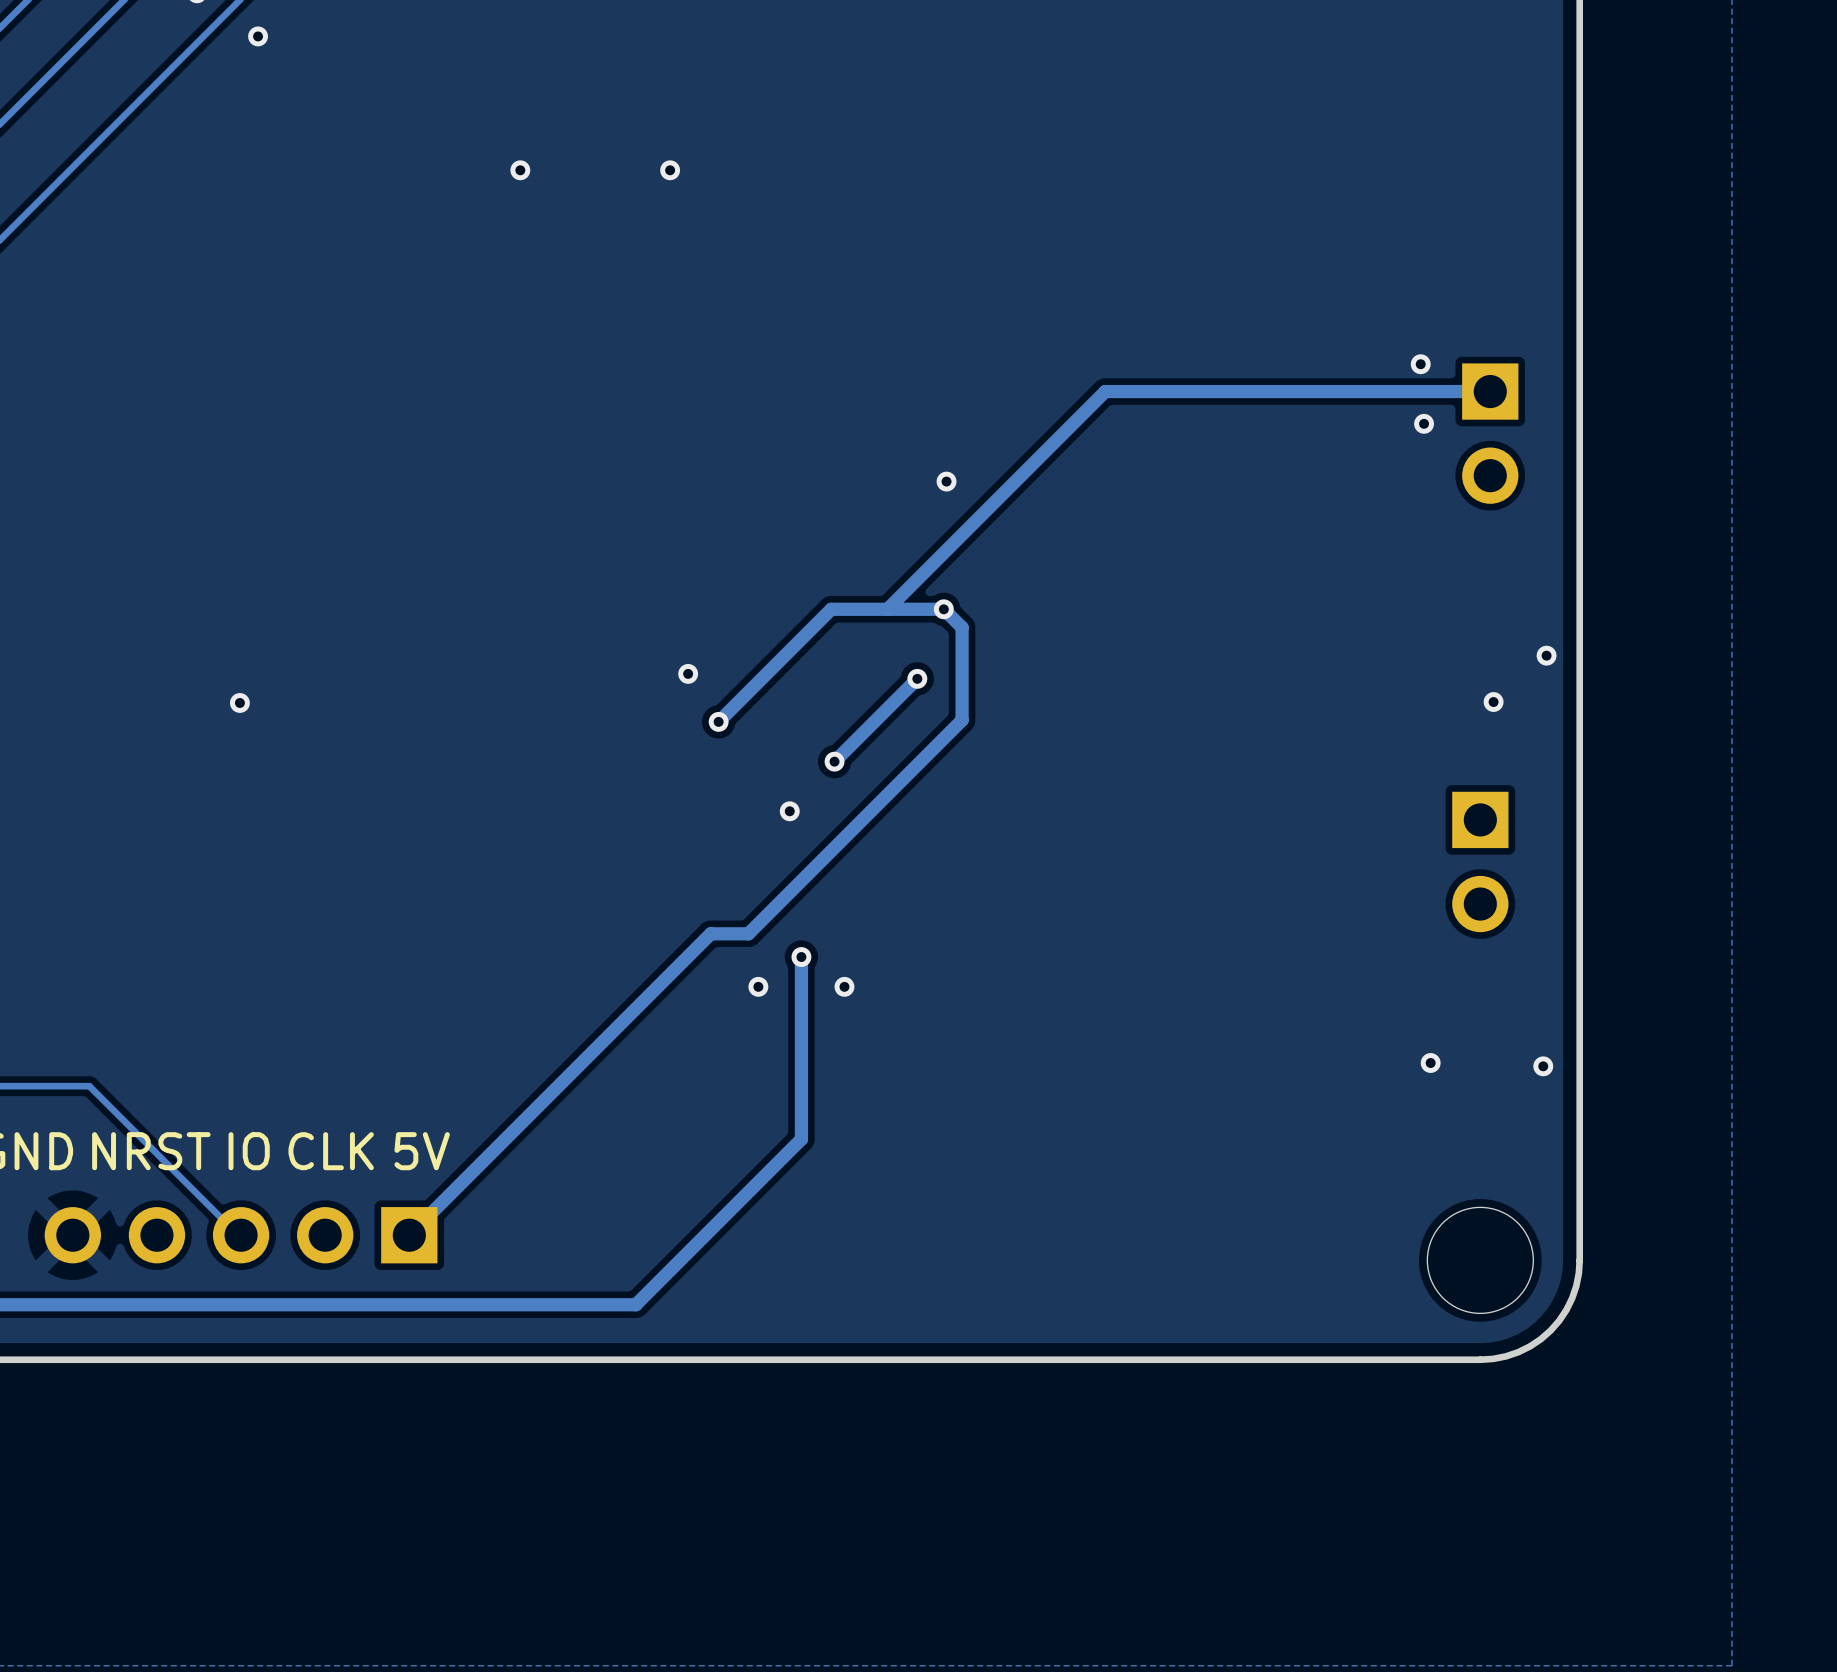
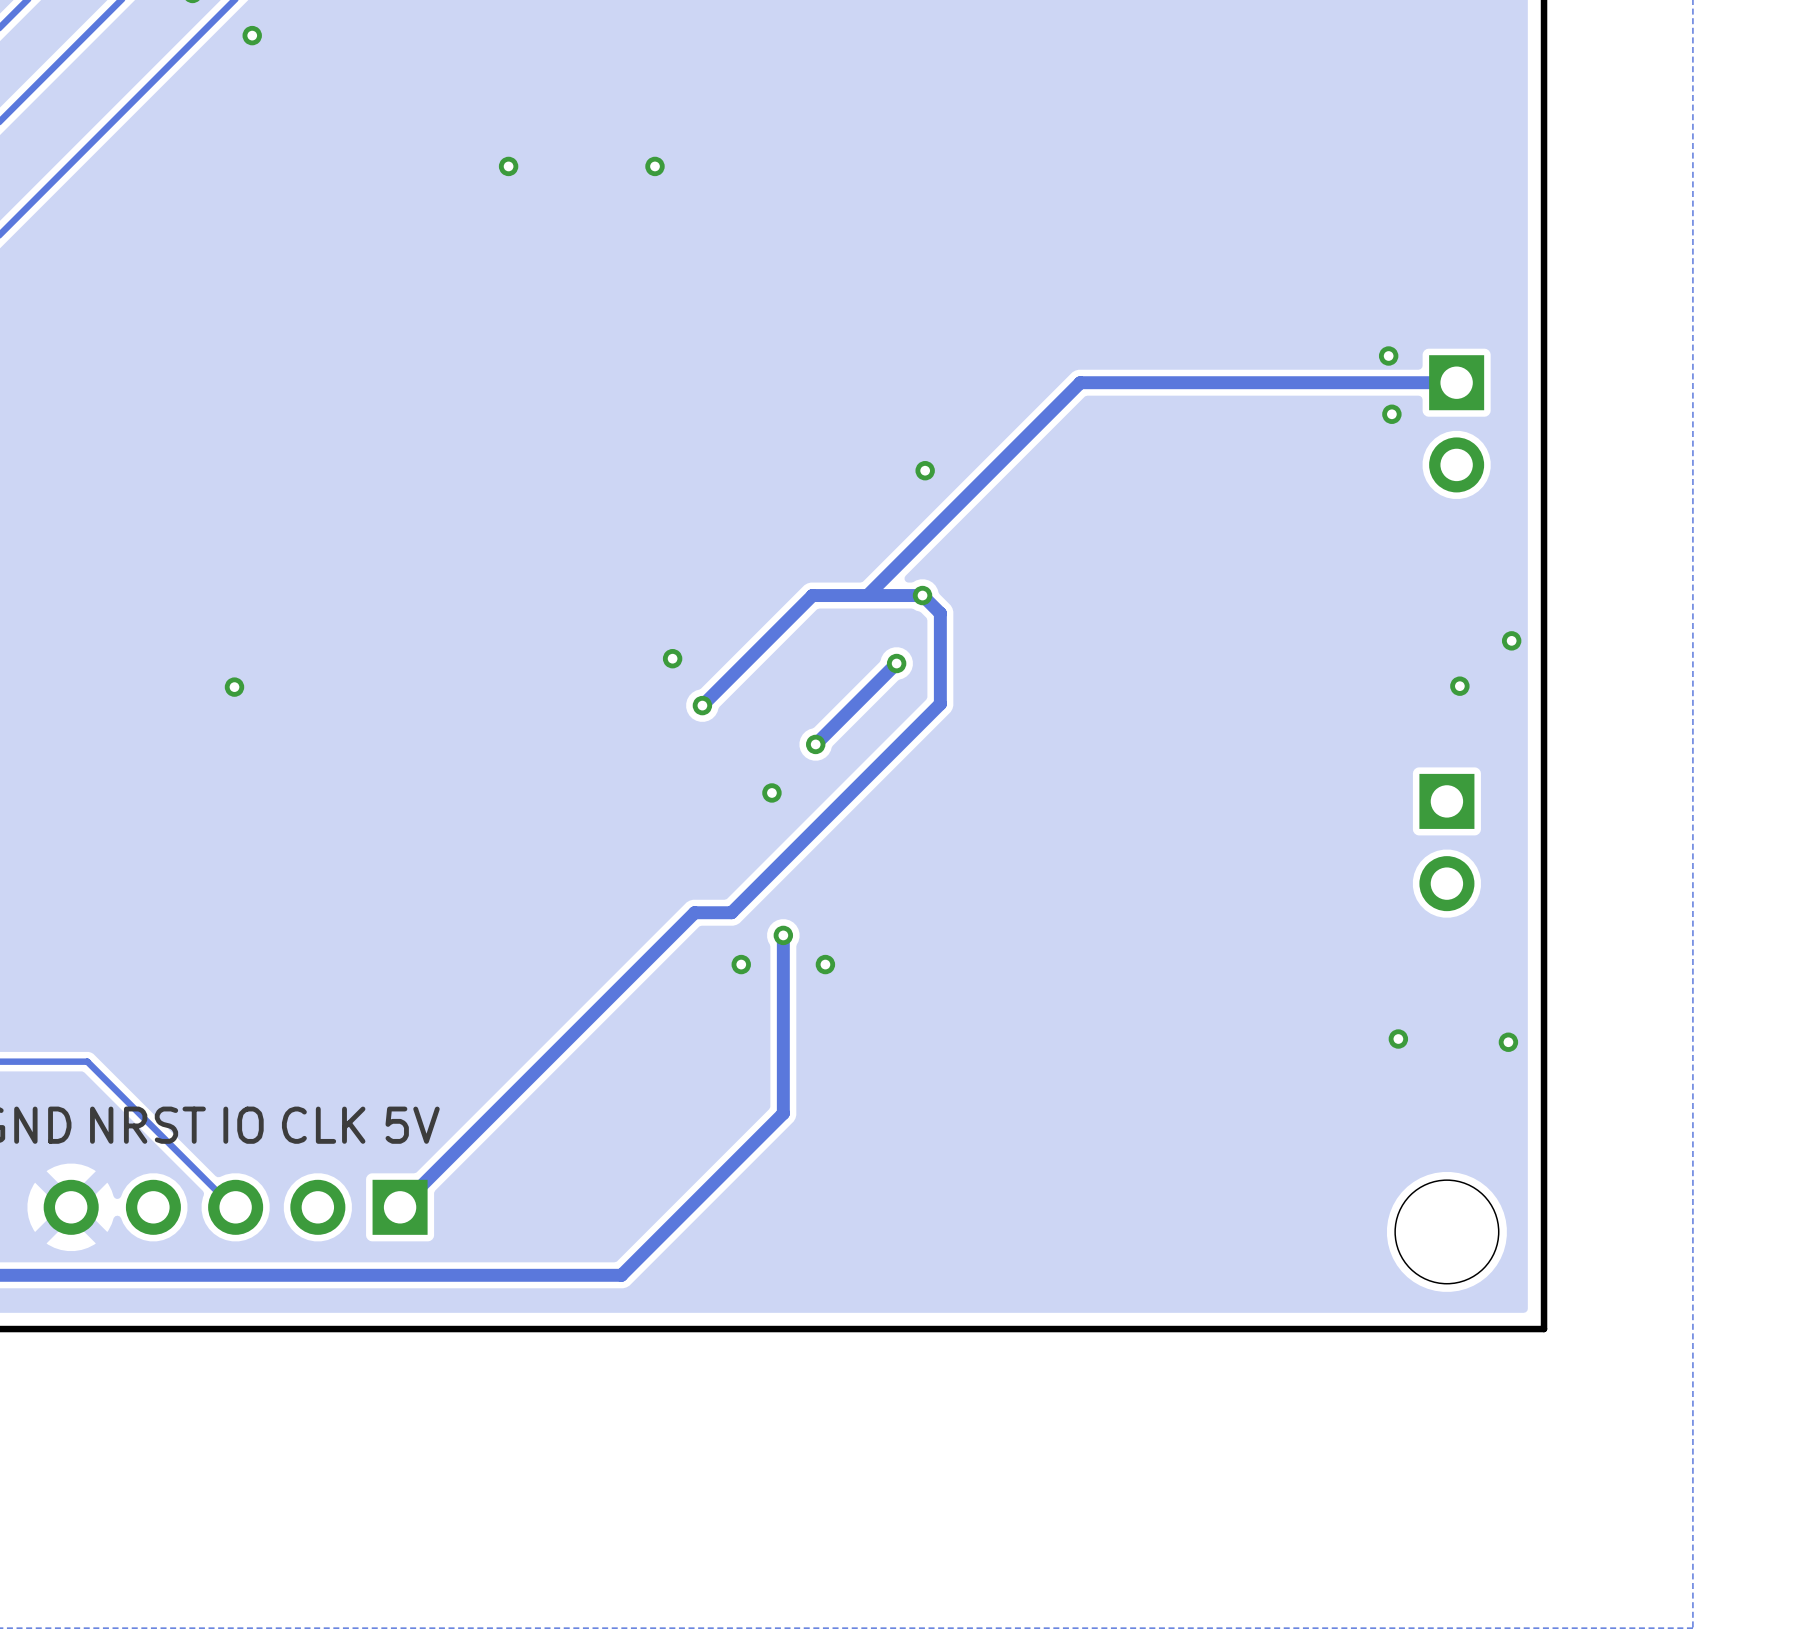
board edge: (1579, 1260) (1576, 1286) (1572, 1298) (1566, 1310) (1550, 1330) (1540, 1339) (1518, 1352) (1506, 1356) (1480, 1359) -> (1544, 1231) (1544, 1329) (1446, 1329)

